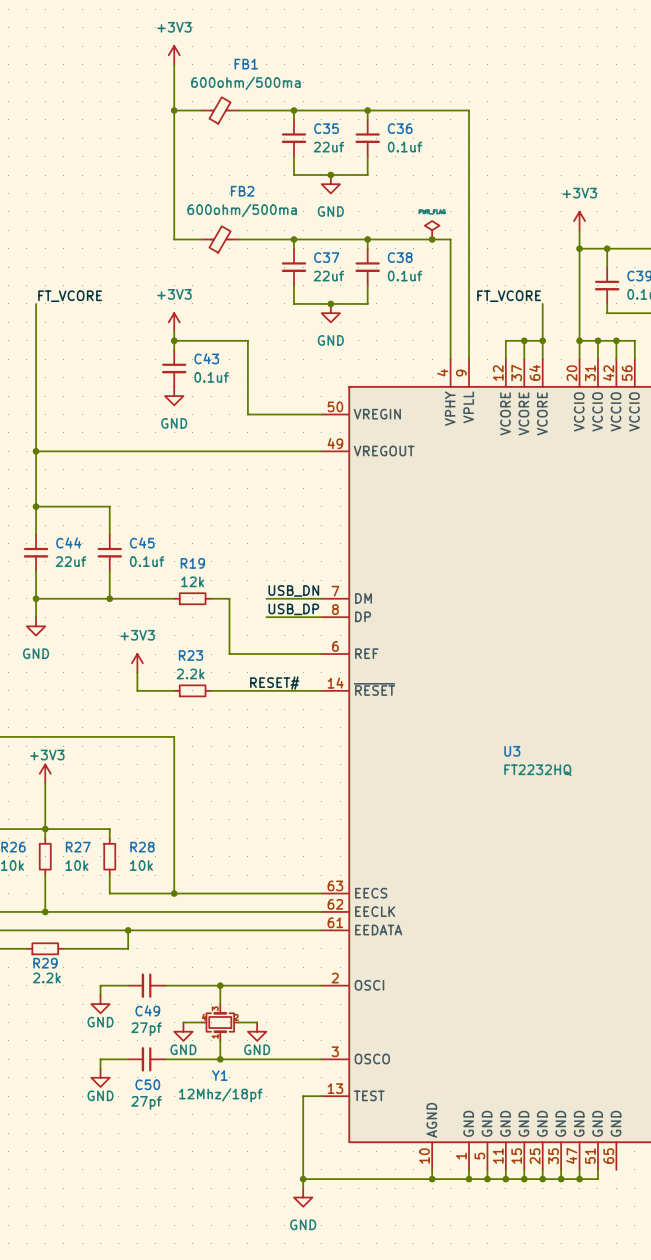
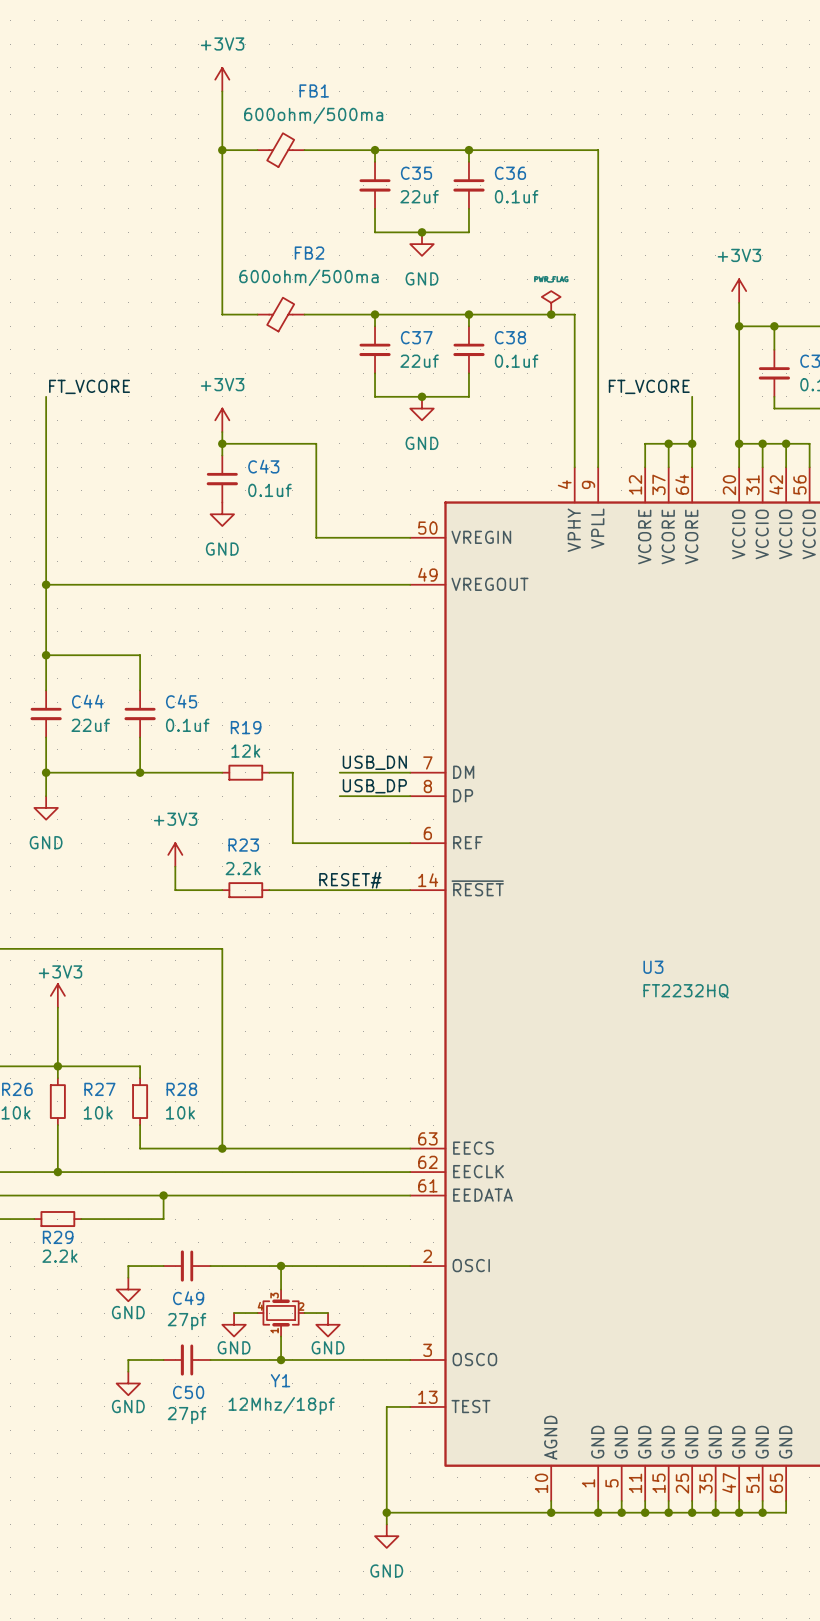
wire: none -> (786, 1500) (786, 1512) (762, 1512)
junction: none -> (762, 1512)

